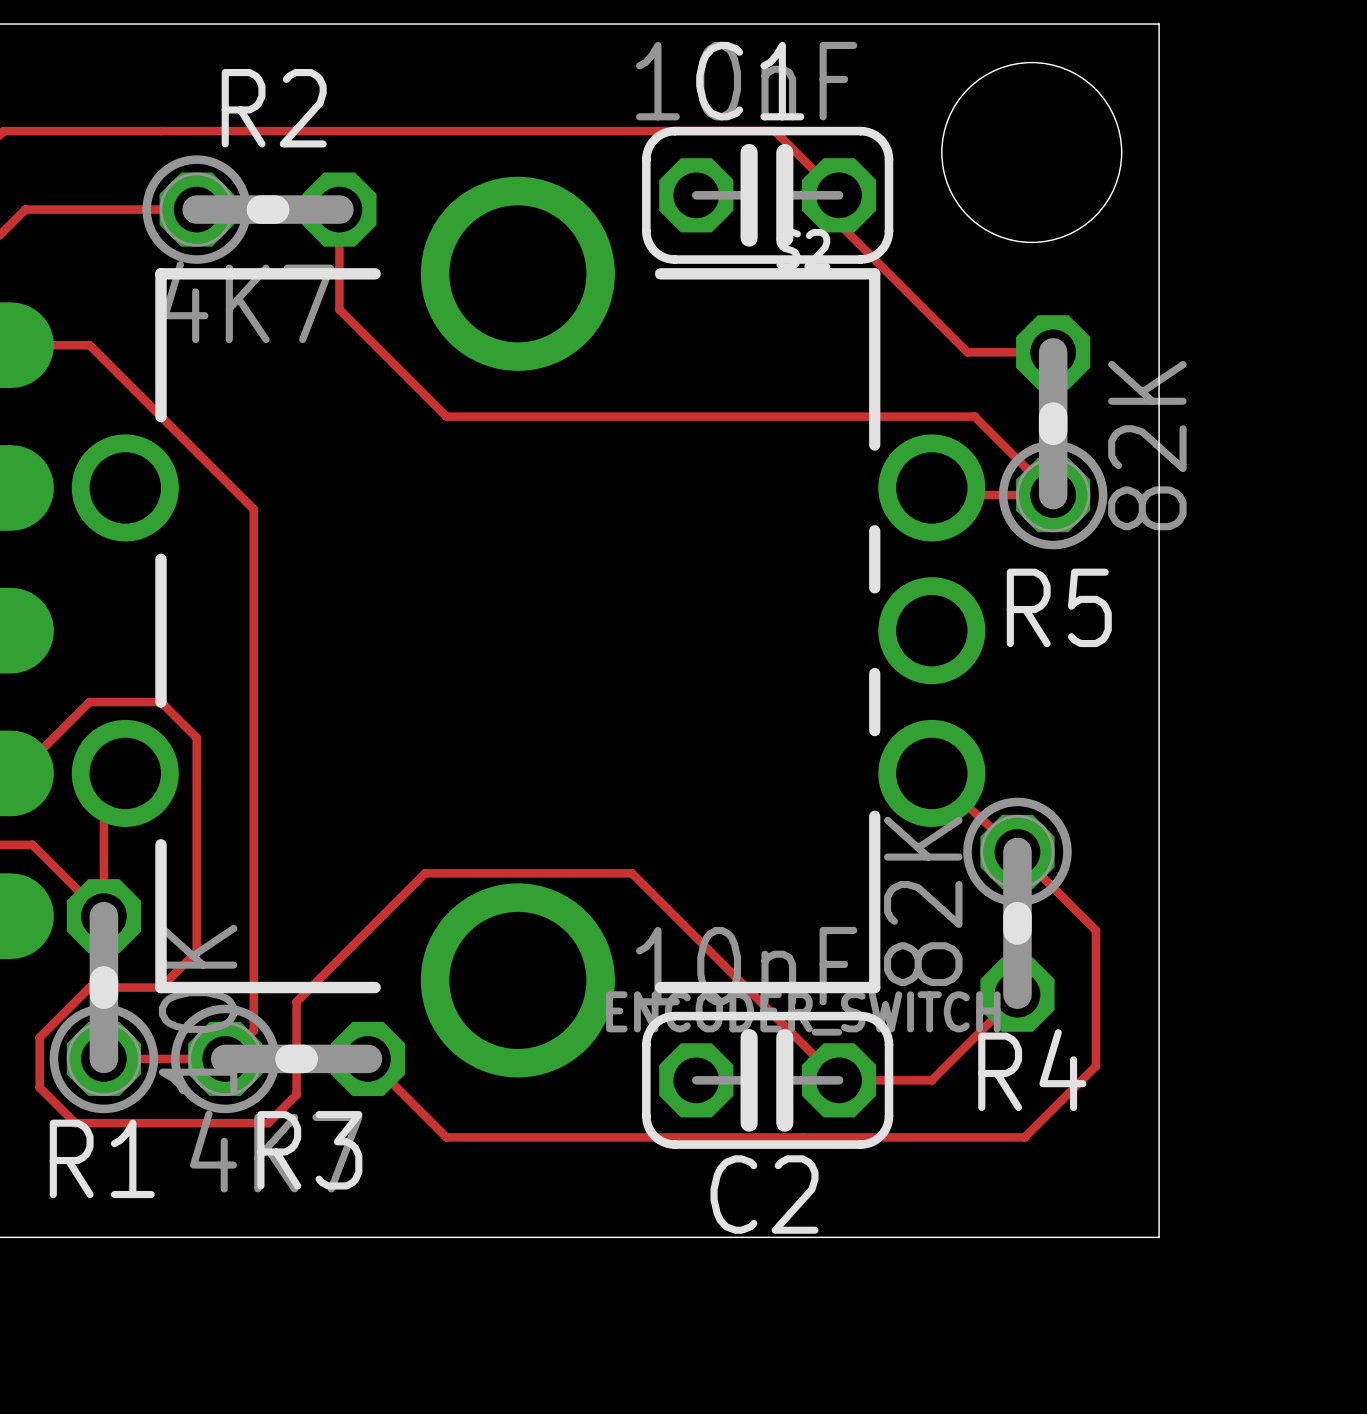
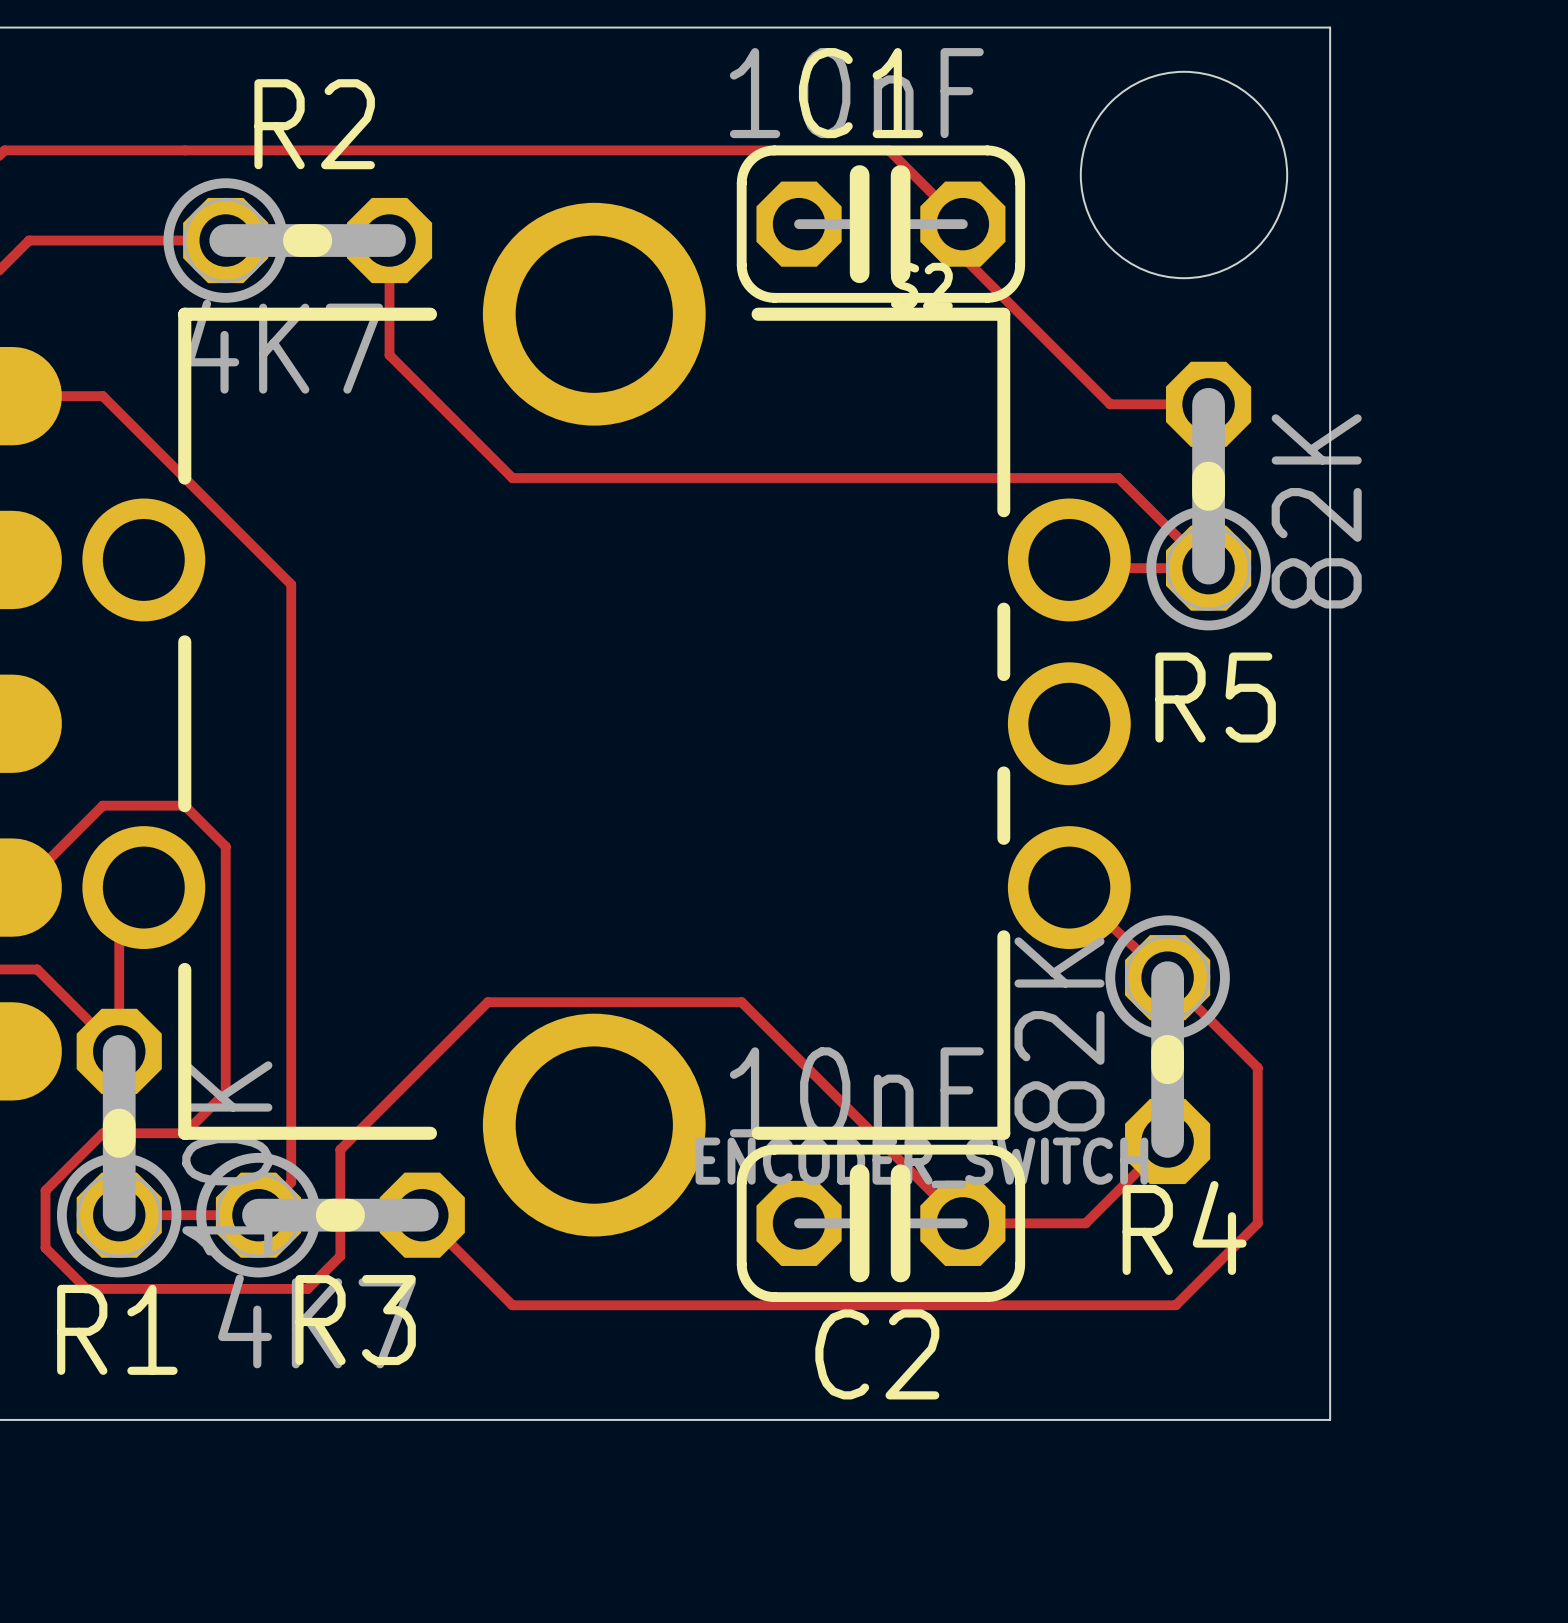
top track: (632, 873) (839, 1080) (931, 1080) (946, 1066) -> (725, 1002) (741, 1002) (962, 1223) (1085, 1223)
C2 position: (767, 1080) -> (880, 1223)

